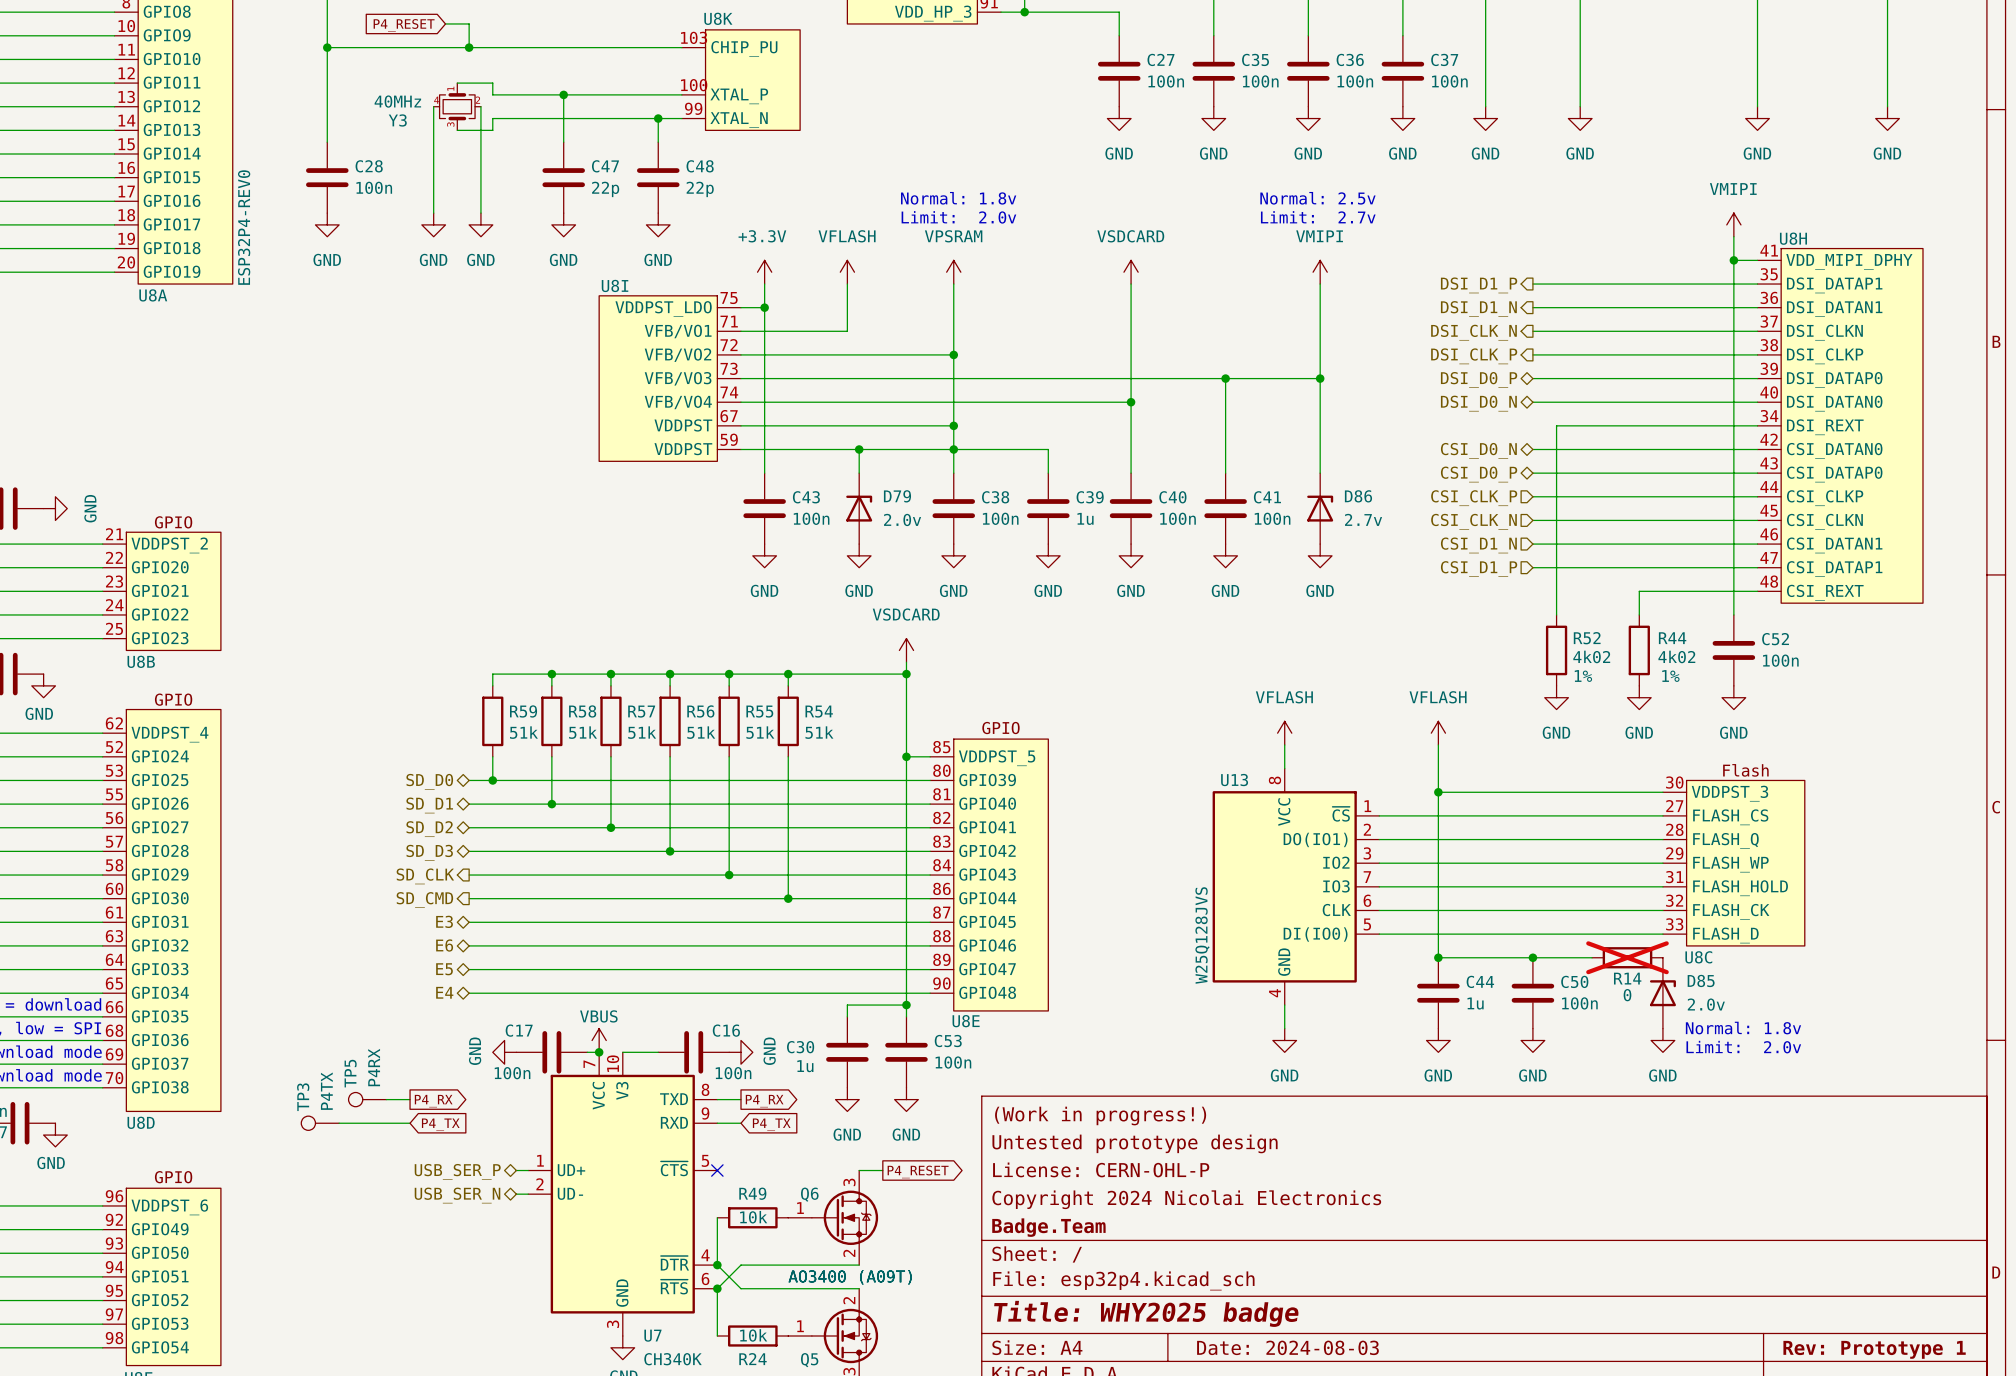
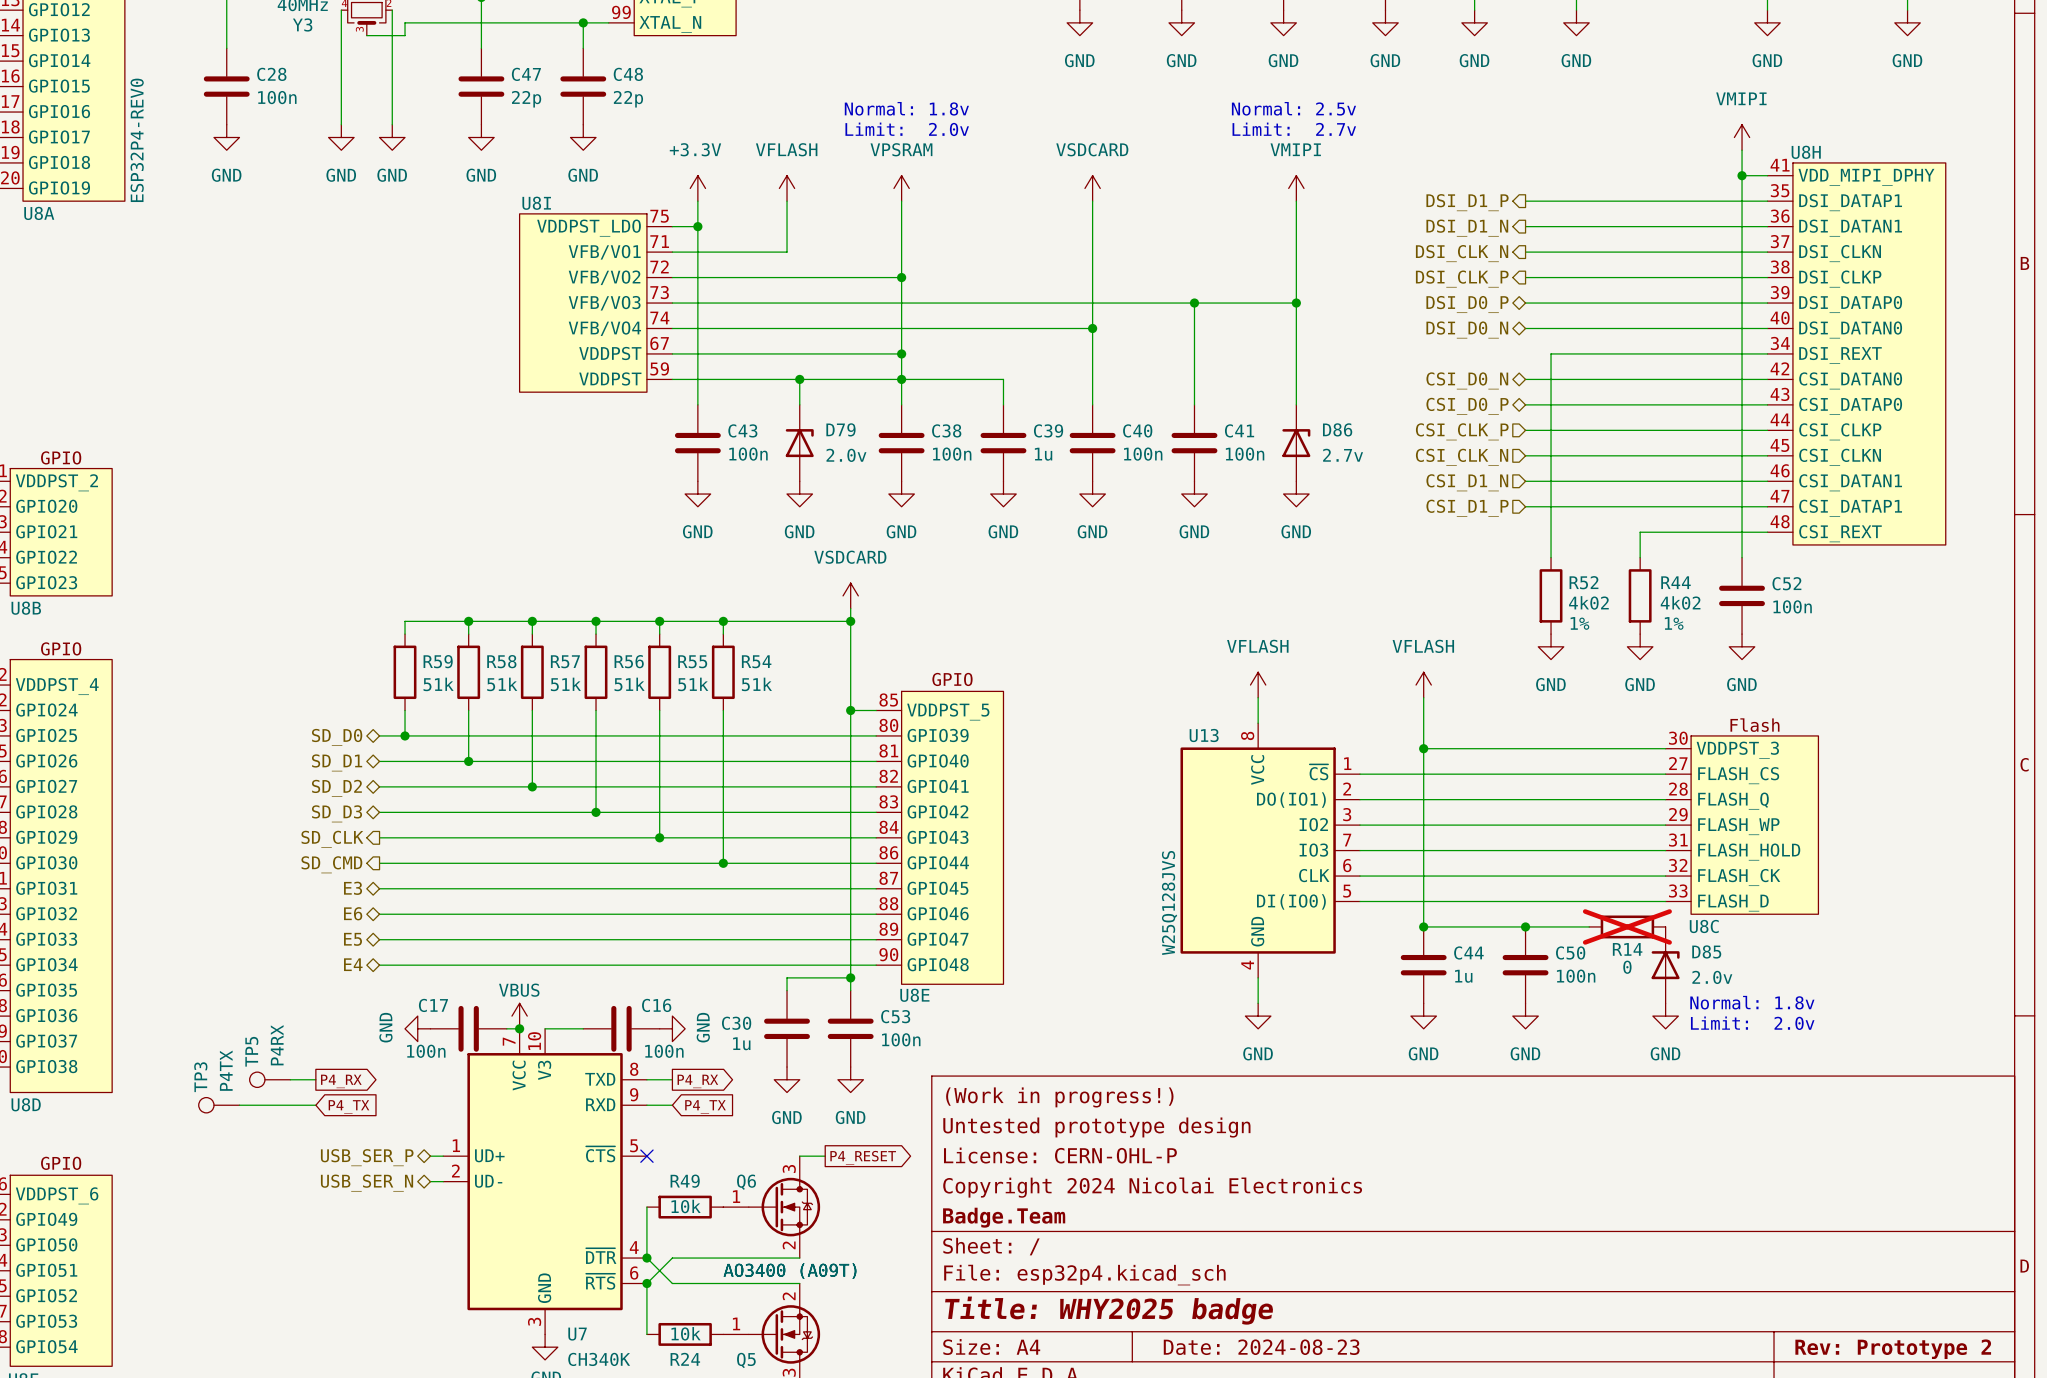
title block: Date: 2024-08-03 (1287, 1347) -> Date: 2024-08-23 (1261, 1347)
title block: Rev: Prototype 1 (1874, 1349) -> Rev: Prototype 2 (1893, 1349)

